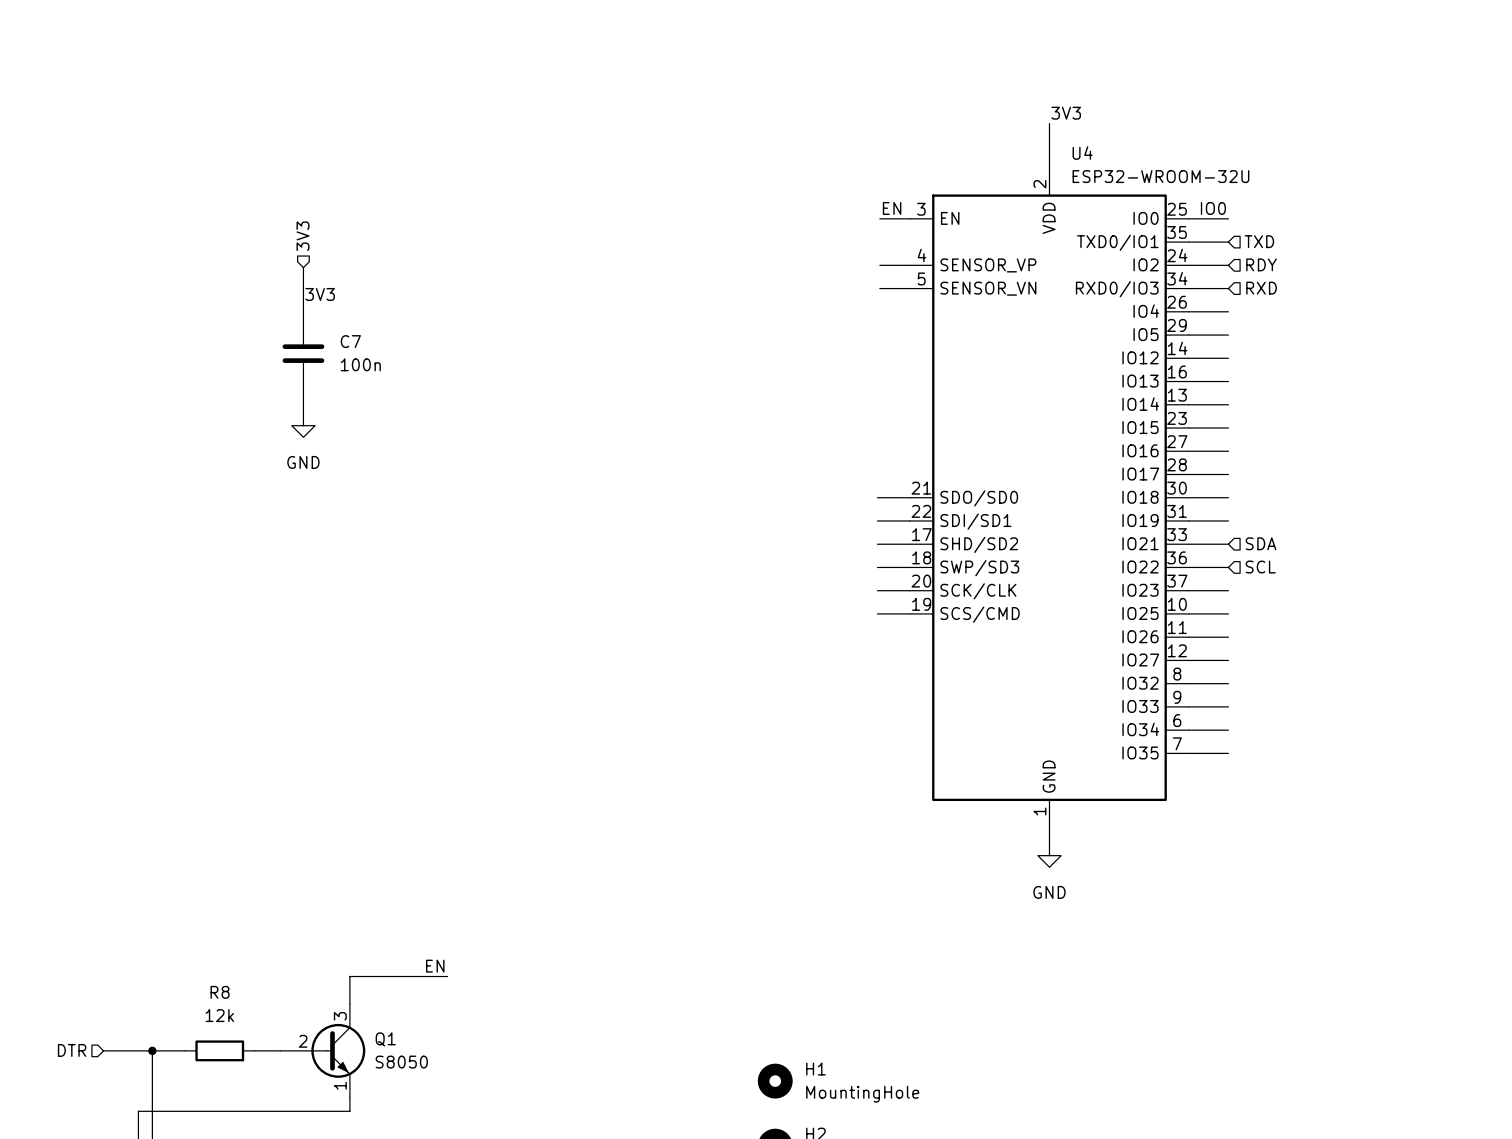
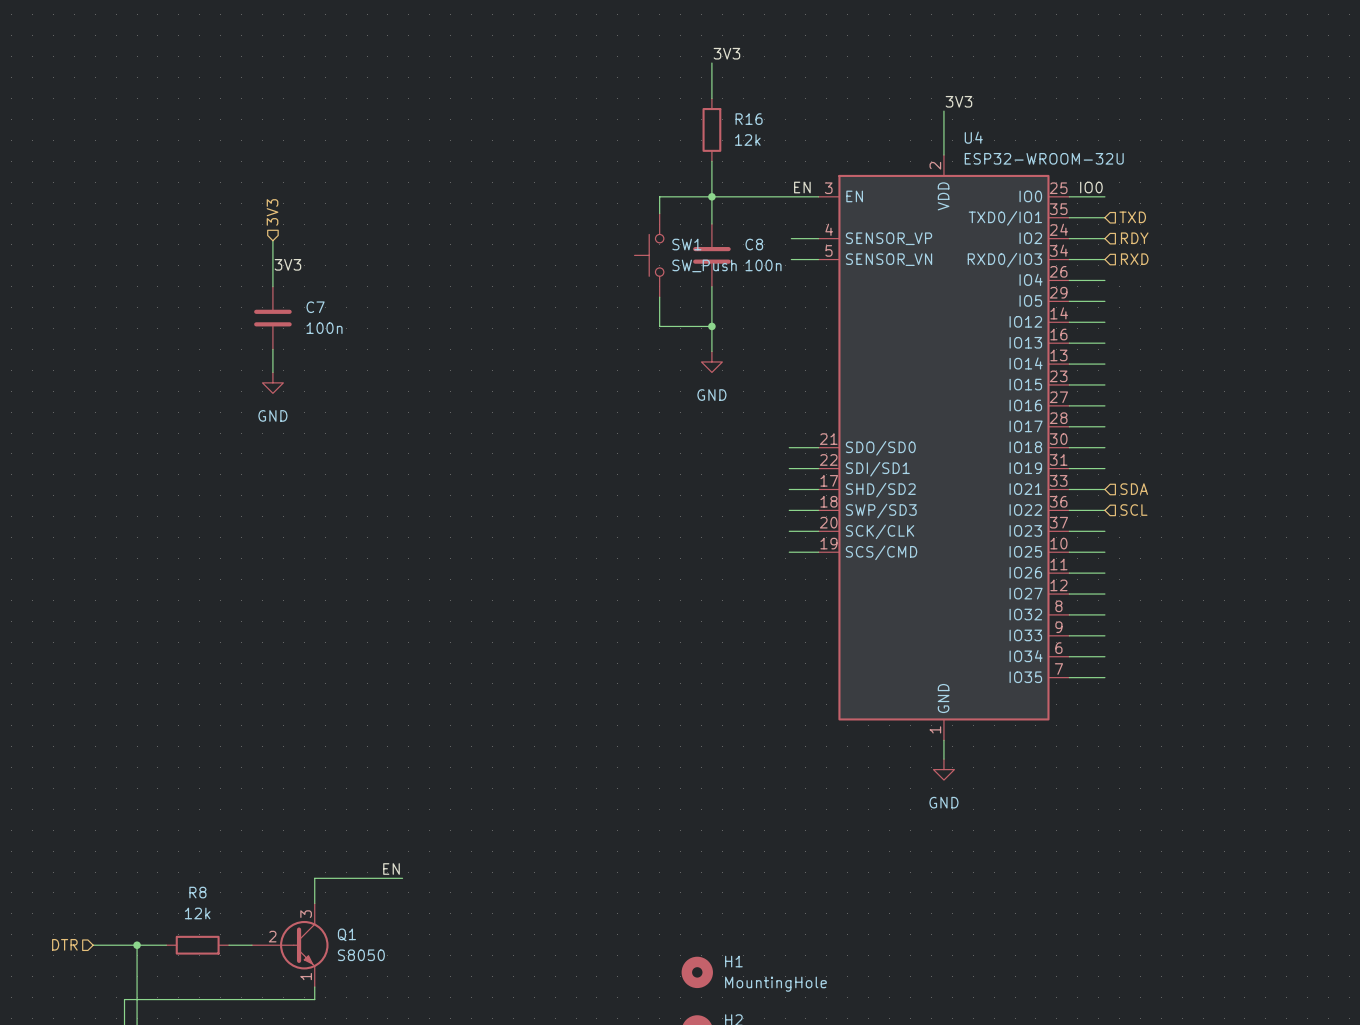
label: none -> 3V3 (726, 53)
wire: none -> (711, 63) (711, 98)
R16: none -> 12k (711, 129)
wire: none -> (711, 161) (711, 224)
junction: none -> (711, 196)
wire: none -> (791, 196) (659, 196) (659, 213)
SW1: none -> SW_Push (649, 255)
C8: none -> 100n (711, 255)
wire: none -> (711, 286) (711, 351)
wire: none -> (659, 297) (659, 326) (711, 326)
junction: none -> (711, 326)
power symbol: none -> GND (711, 361)

